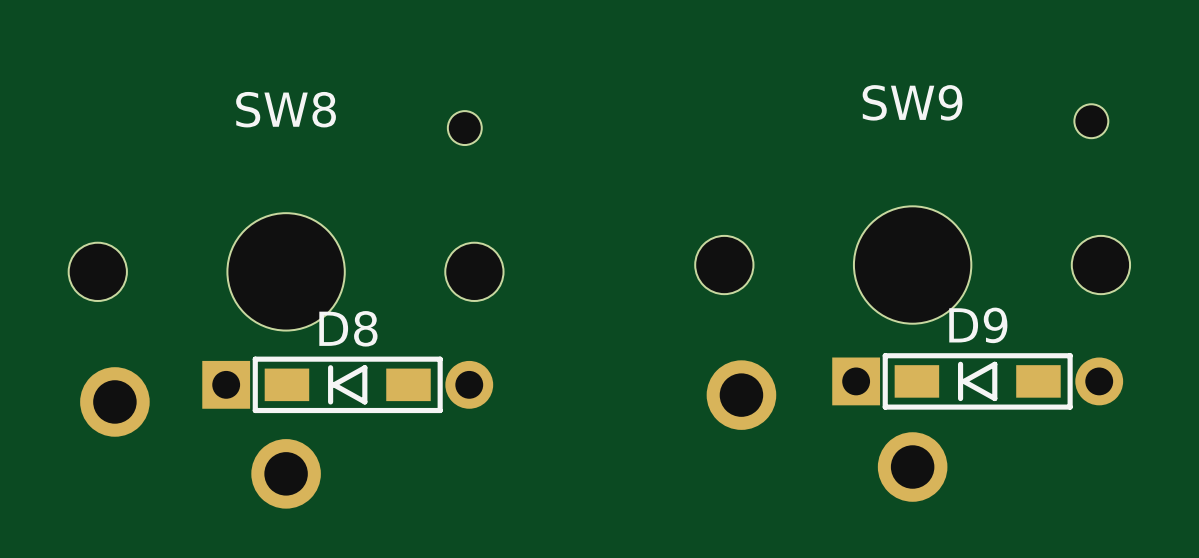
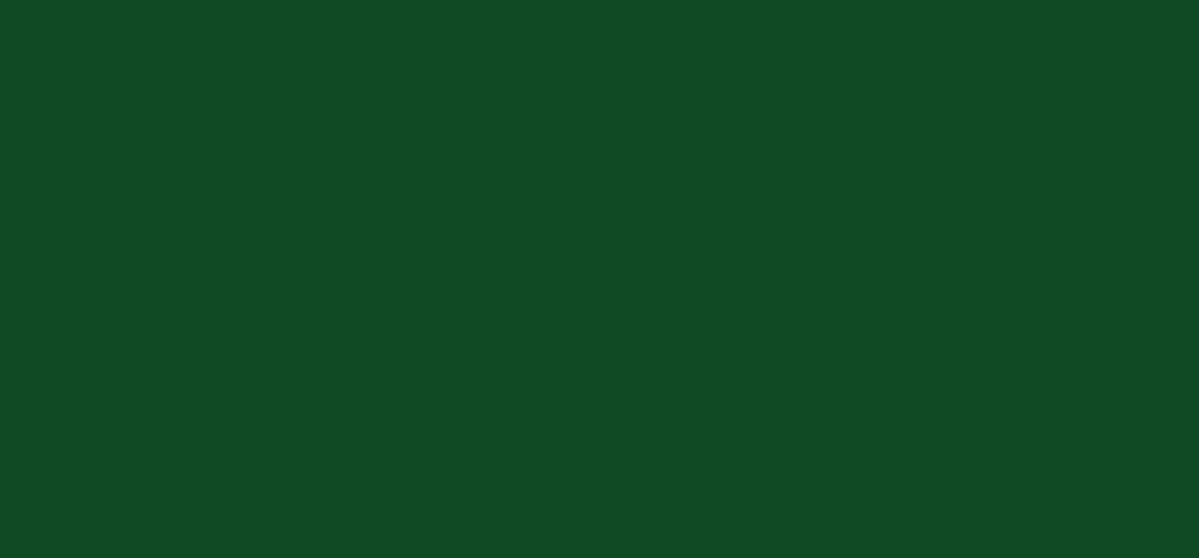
SW9: (912, 303) -> none
SW8: (286, 309) -> none
D9: (977, 381) -> none
D8: (347, 384) -> none

